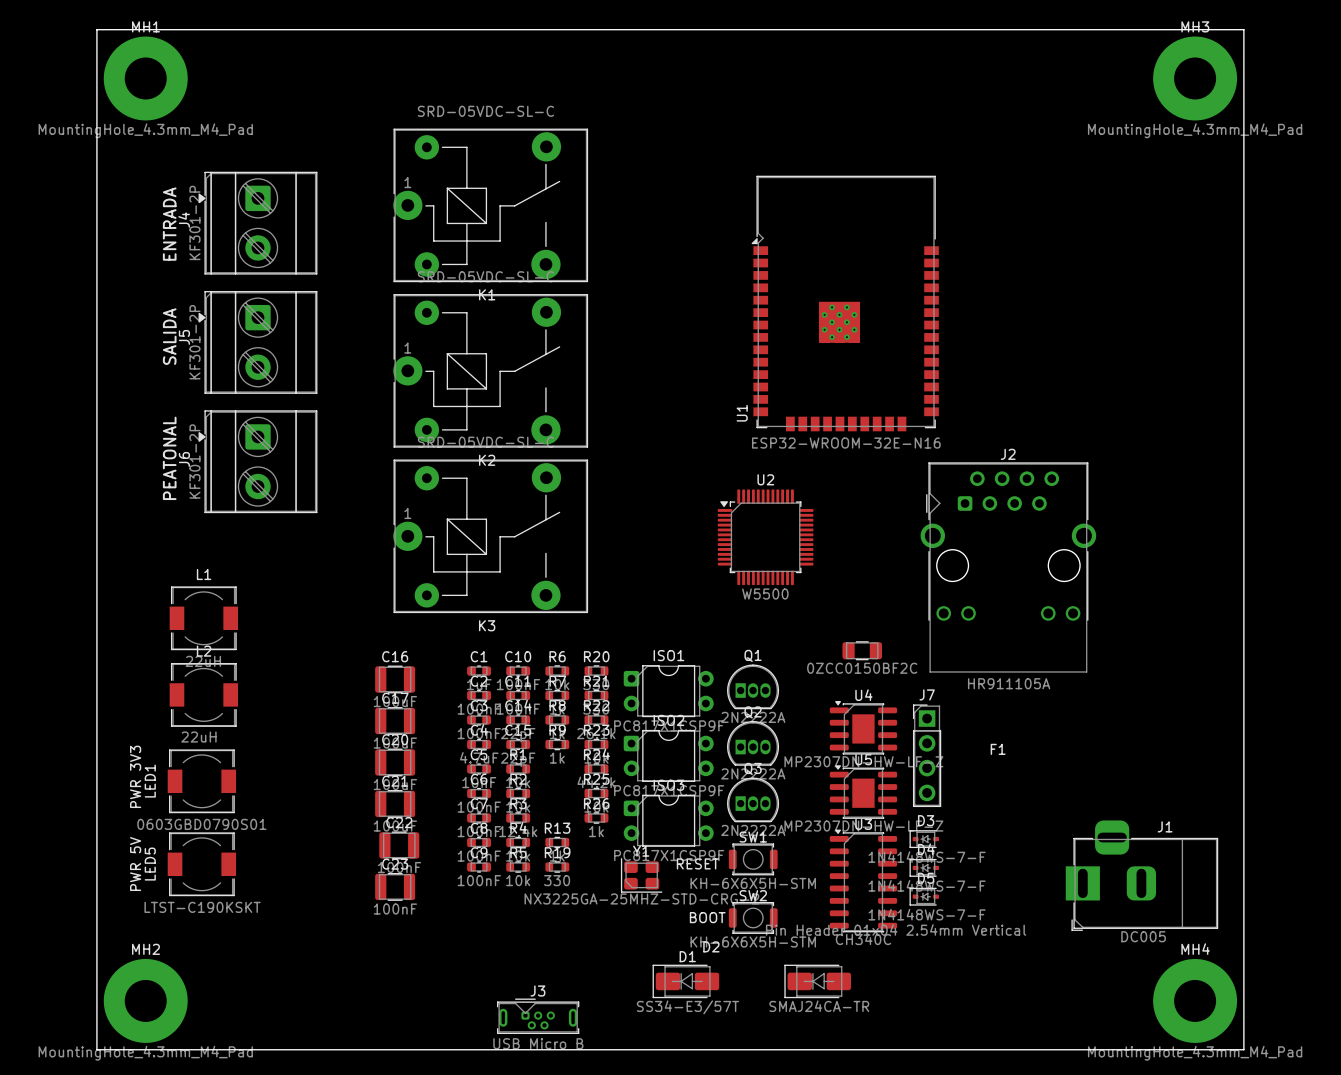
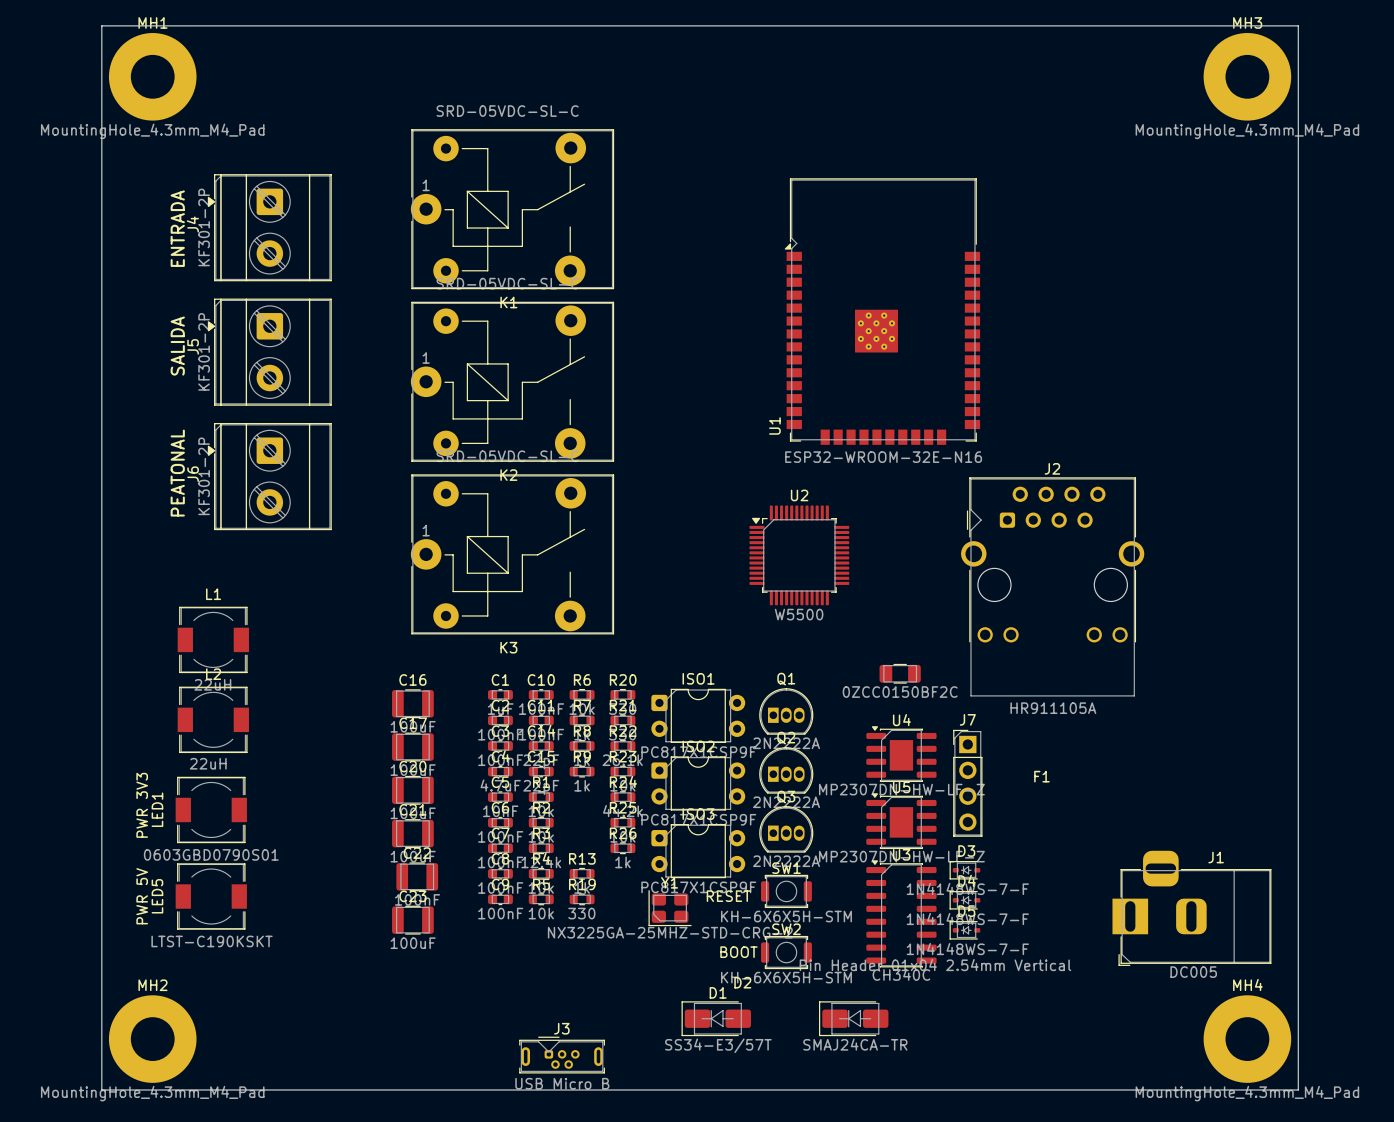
C23 value: 100nF (395, 909) -> 100uF (413, 943)

